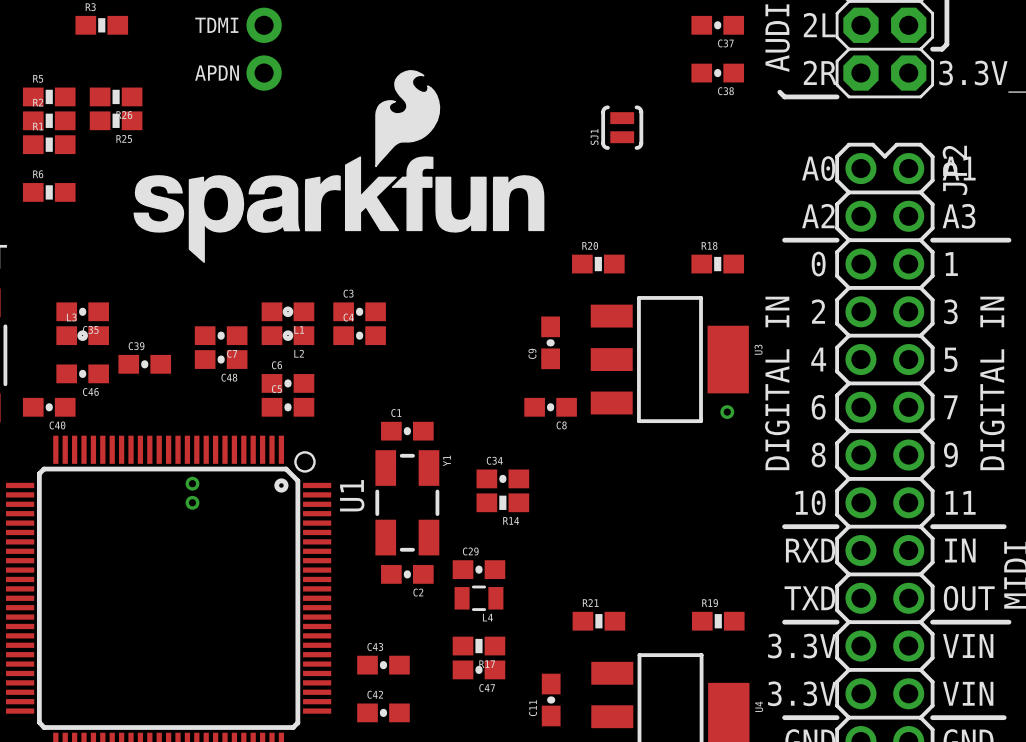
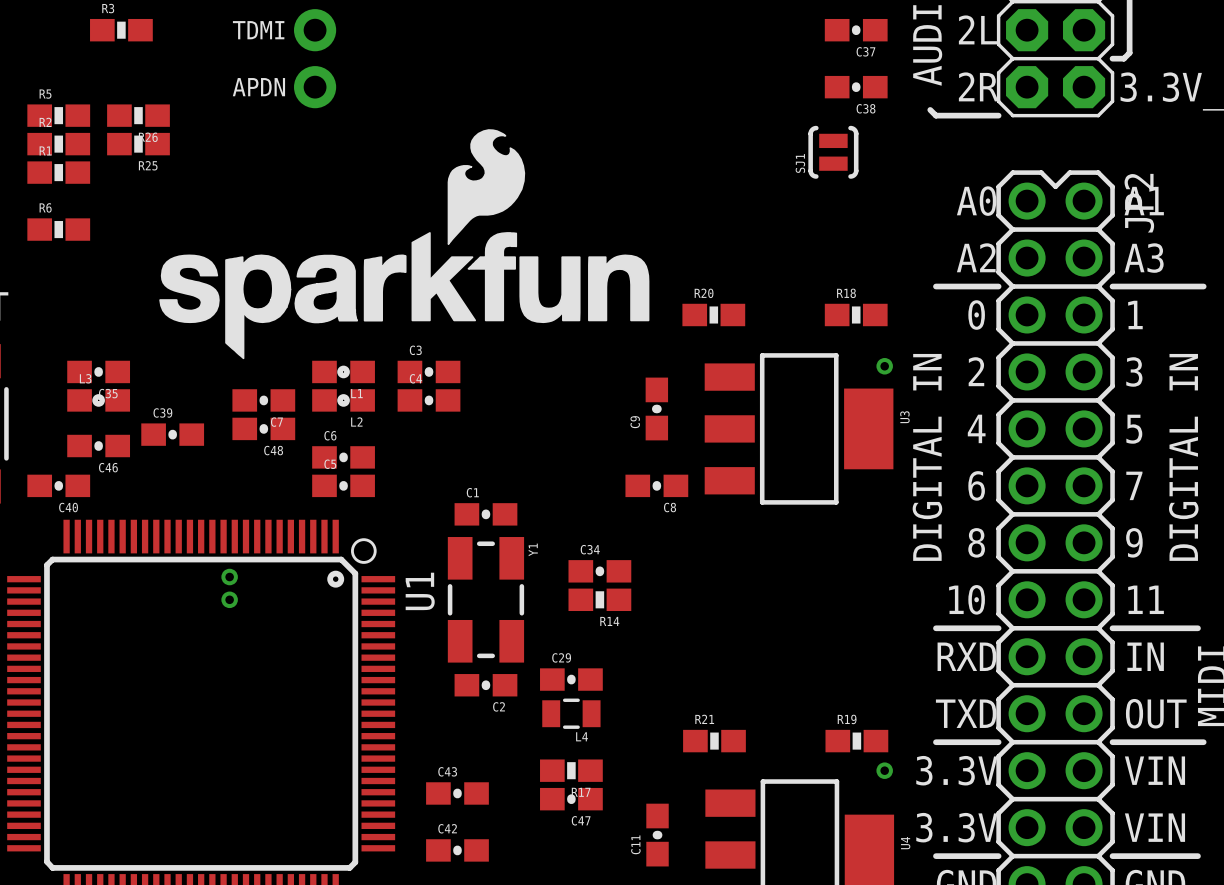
SJ1 position: (622, 127) -> (833, 152)
drawing position: (338, 166) -> (404, 244)
part position: (727, 412) -> (884, 366)
part: none -> (884, 770)

